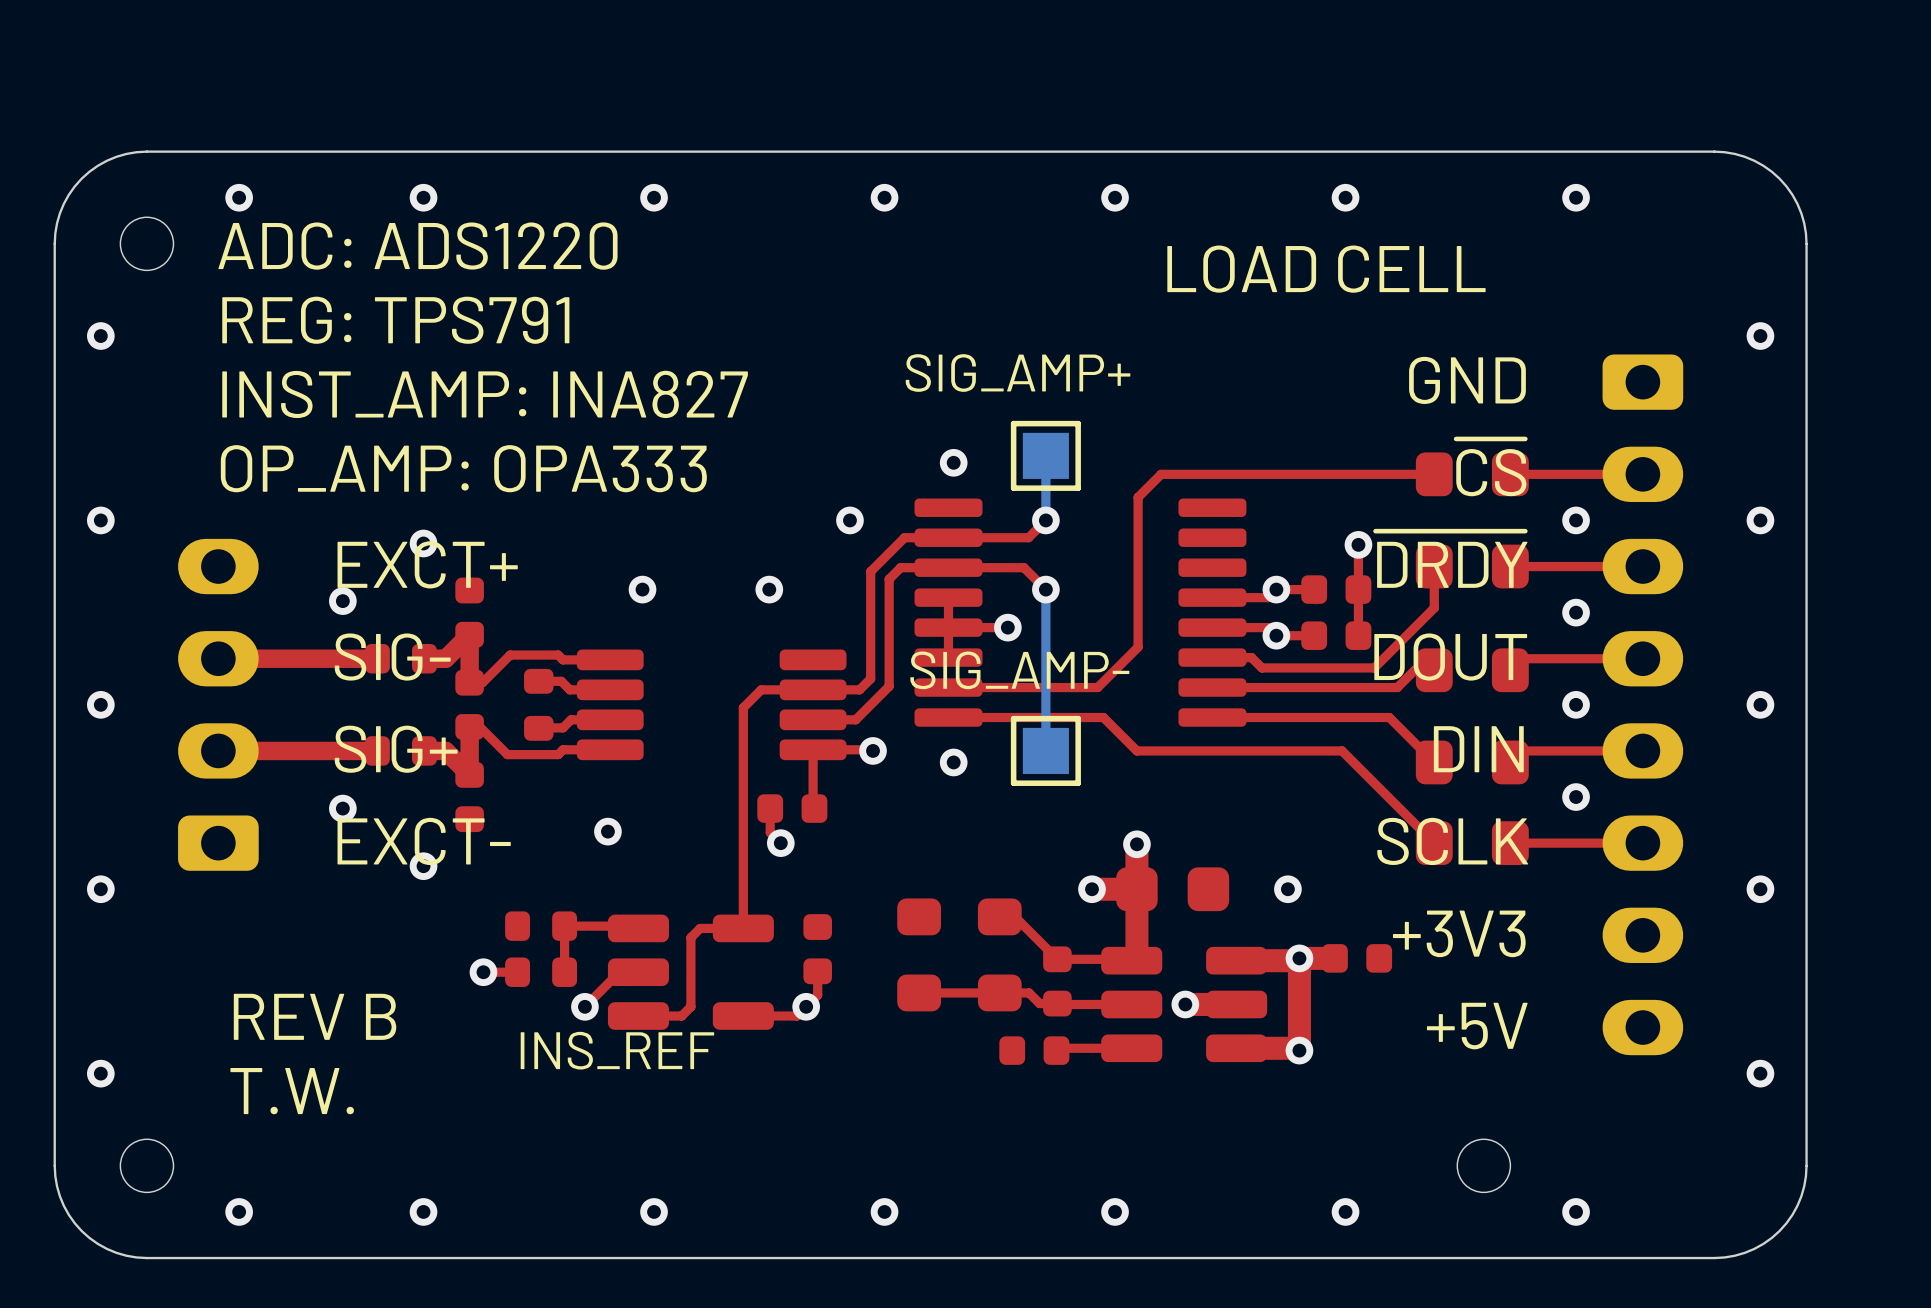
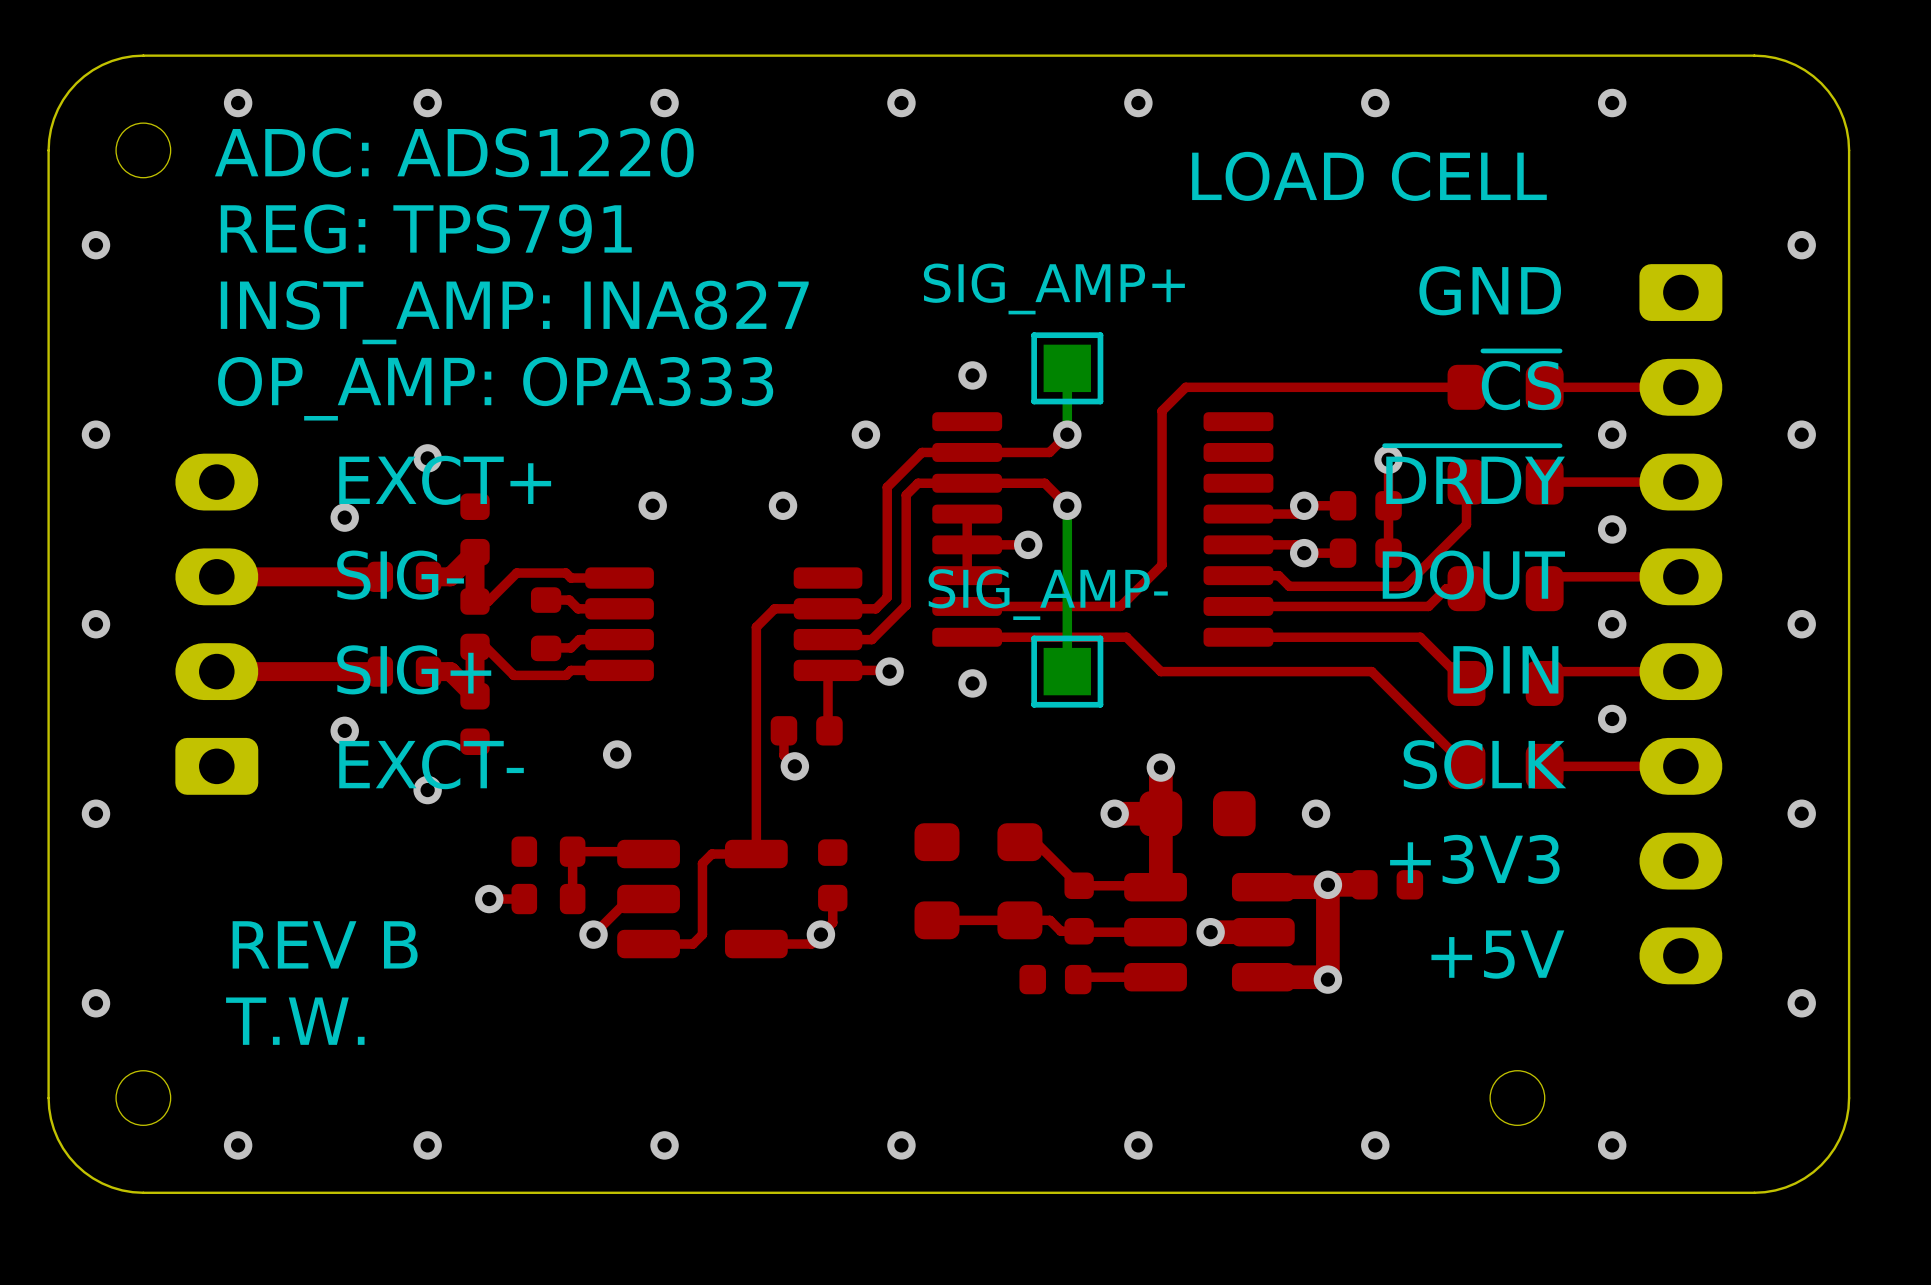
text: INS_REF (617, 1050) -> none

